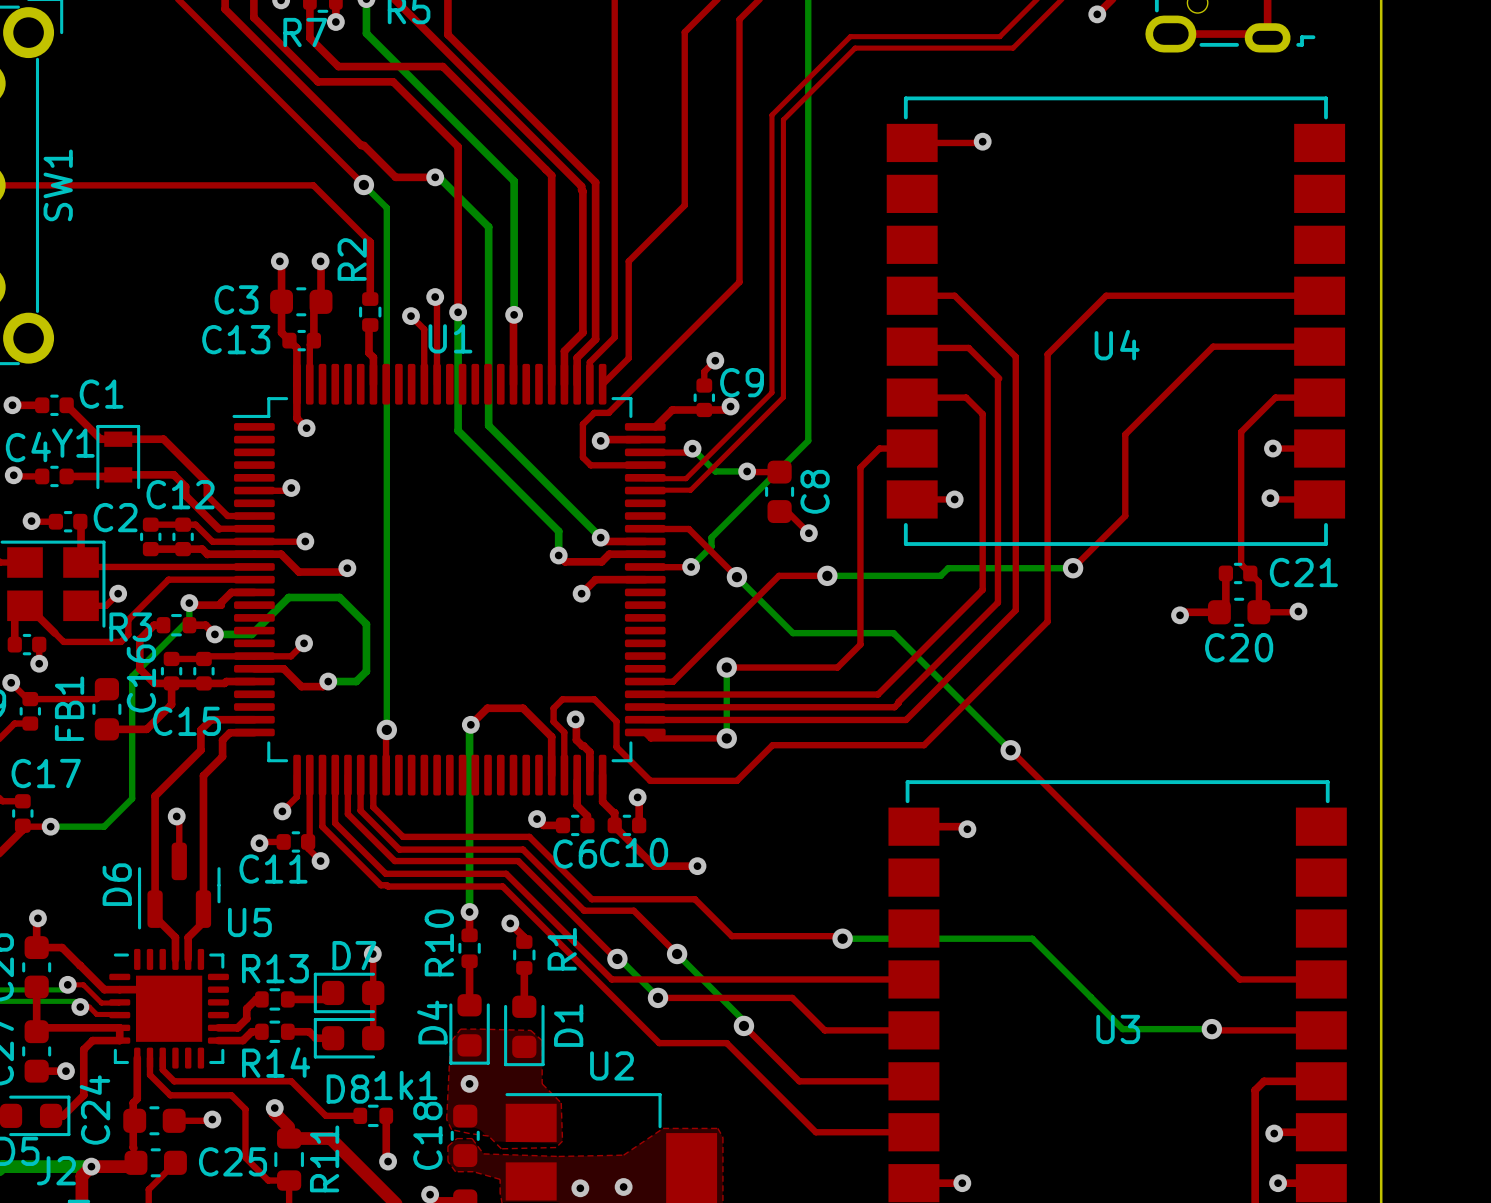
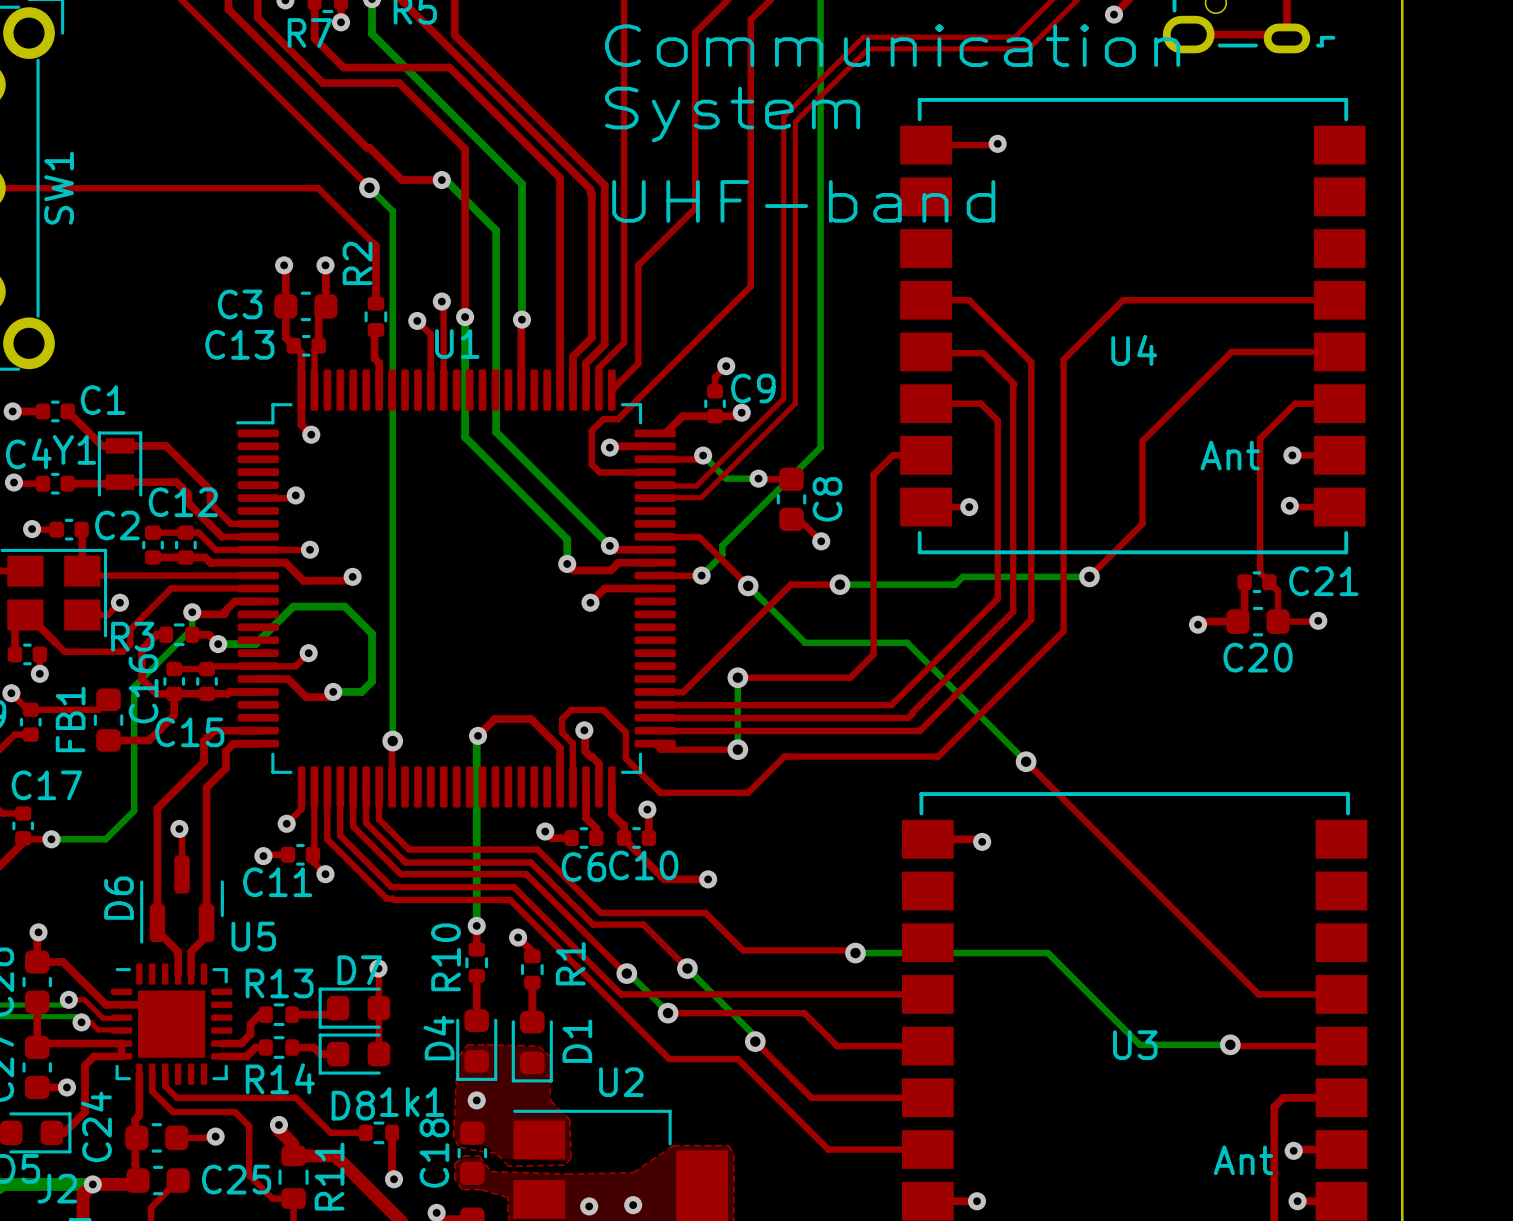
text: none -> Communication (892, 45)
text: none -> System (732, 114)
text: none -> UHF-band (803, 201)
text: none -> Ant (1230, 455)
text: none -> Ant (1243, 1160)

